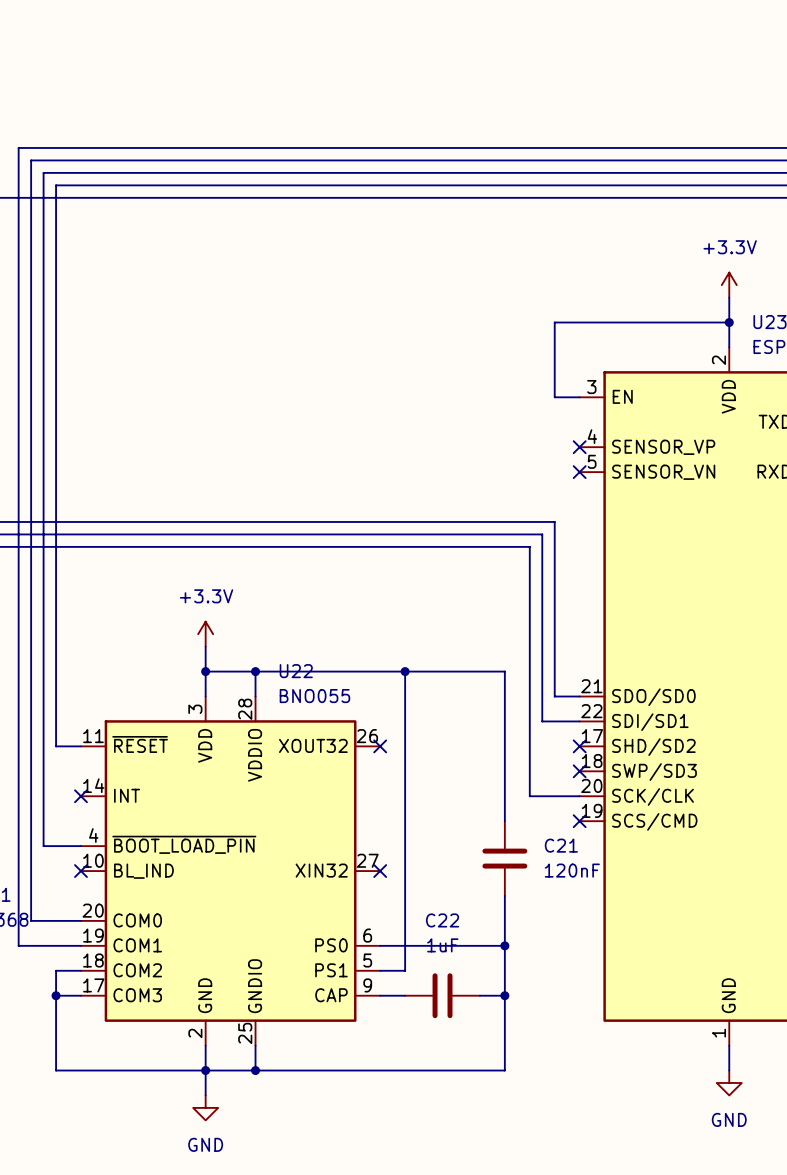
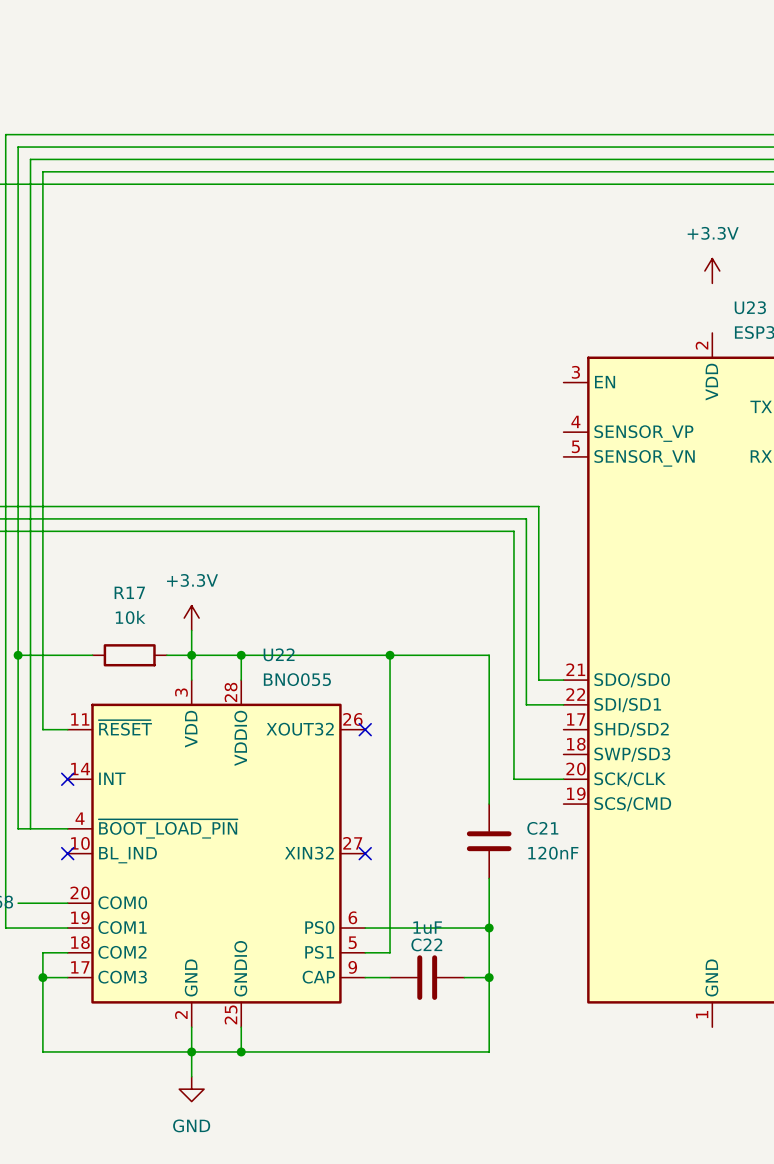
wire: (729, 297) (729, 347) -> none
wire: (729, 322) (554, 322) (554, 397) (579, 397) -> none
junction: (729, 322) -> none
no-connect mark: (579, 447) -> none
no-connect mark: (579, 472) -> none
wire: none -> (18, 655) (92, 655)
junction: none -> (18, 655)
R17: none -> 10k (129, 655)
wire: none -> (166, 655) (191, 655)
no-connect mark: (579, 746) -> none
no-connect mark: (579, 771) -> none
no-connect mark: (579, 821) -> none
wire: (31, 846) (31, 920) -> (18, 828) (30, 828)
C22 name position: C22 (442, 920) -> C22 (426, 944)
wire: (729, 1045) (729, 1070) -> none
power symbol: GND (729, 1082) -> none

